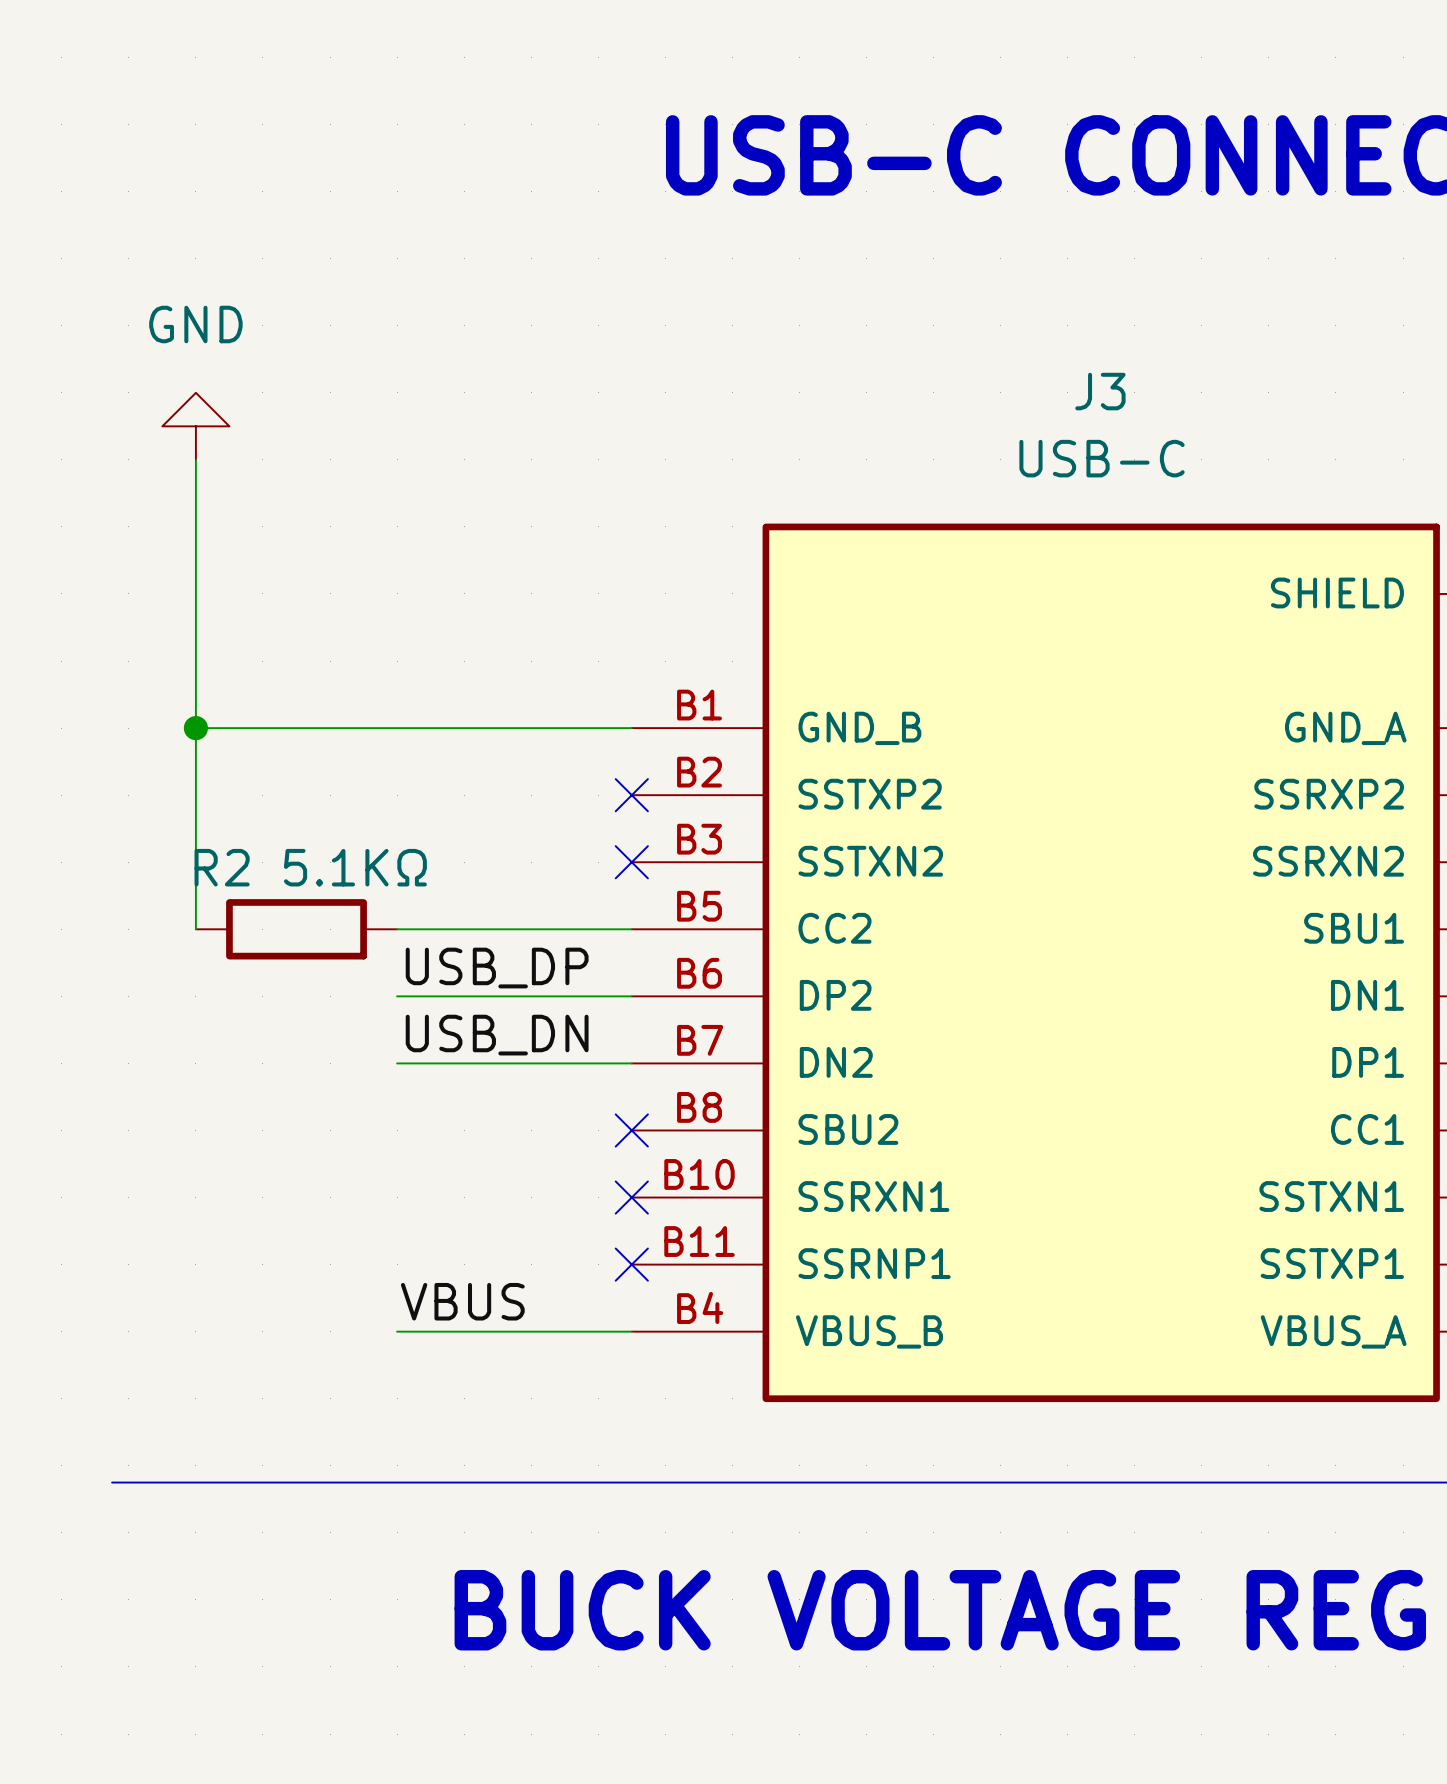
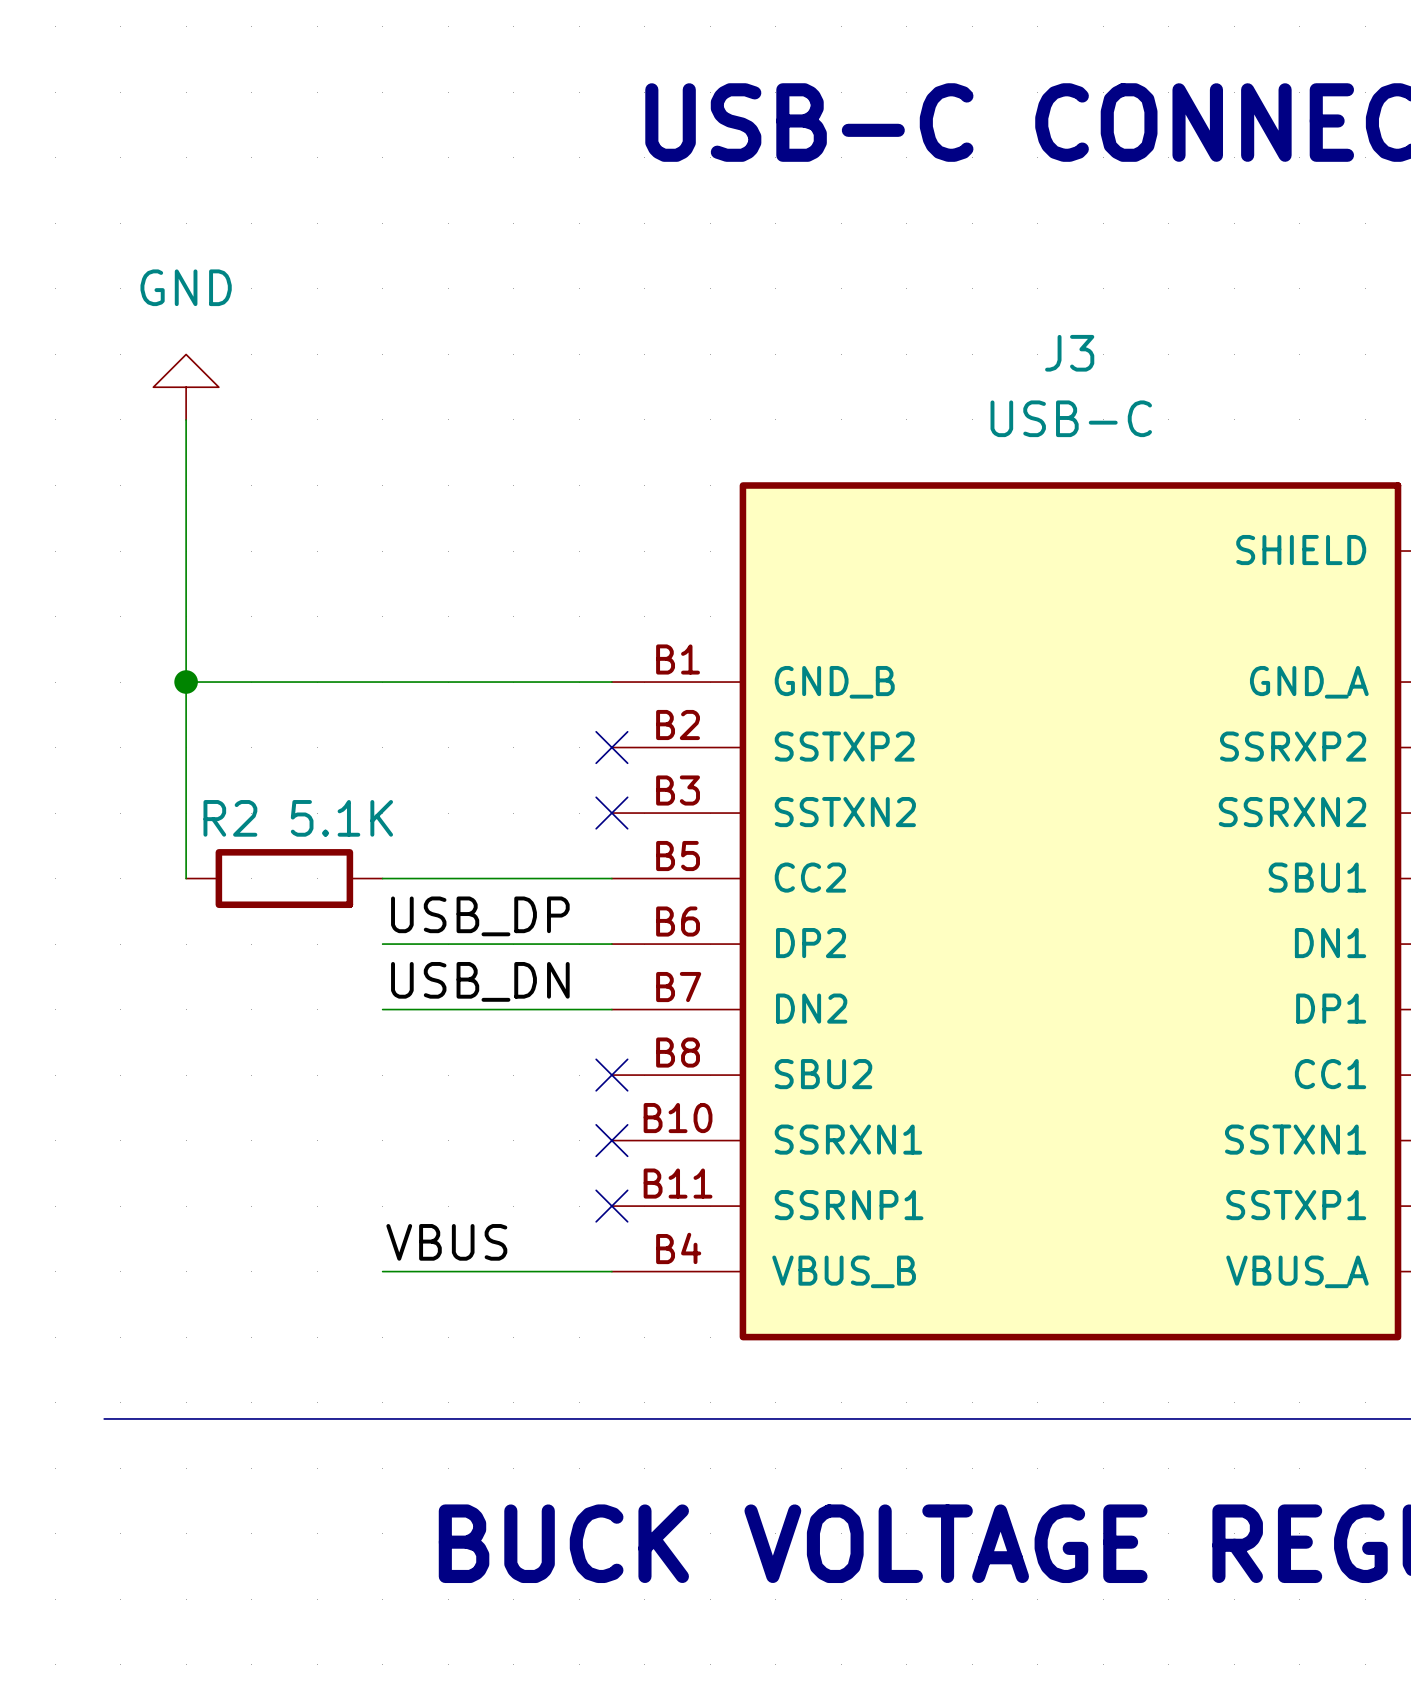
part value: R2 5.1KΩ (310, 867) -> R2 5.1K (298, 818)

